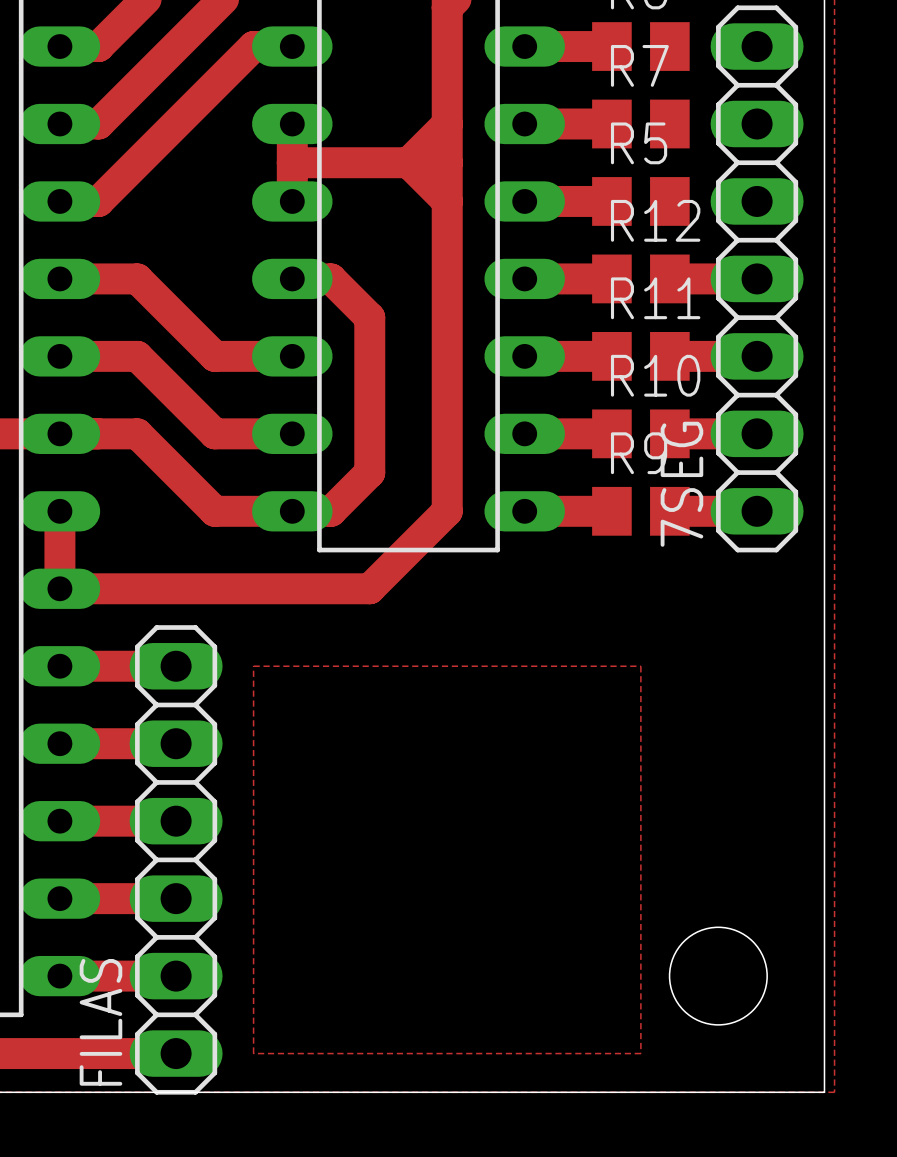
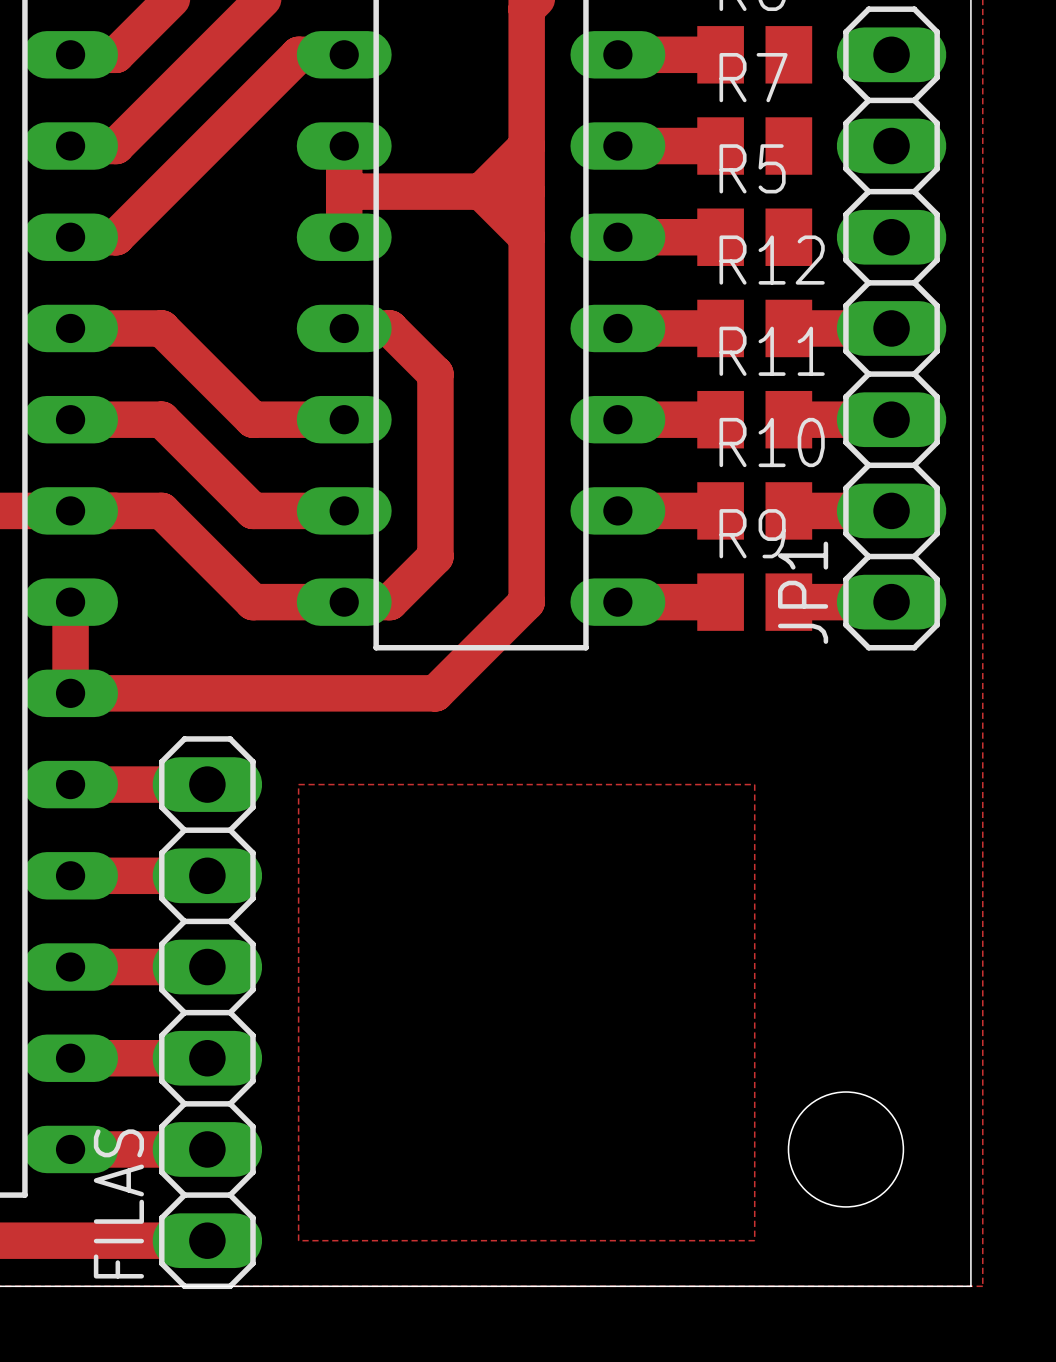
7SEG name: 7SEG (681, 484) -> JP1 (803, 592)

